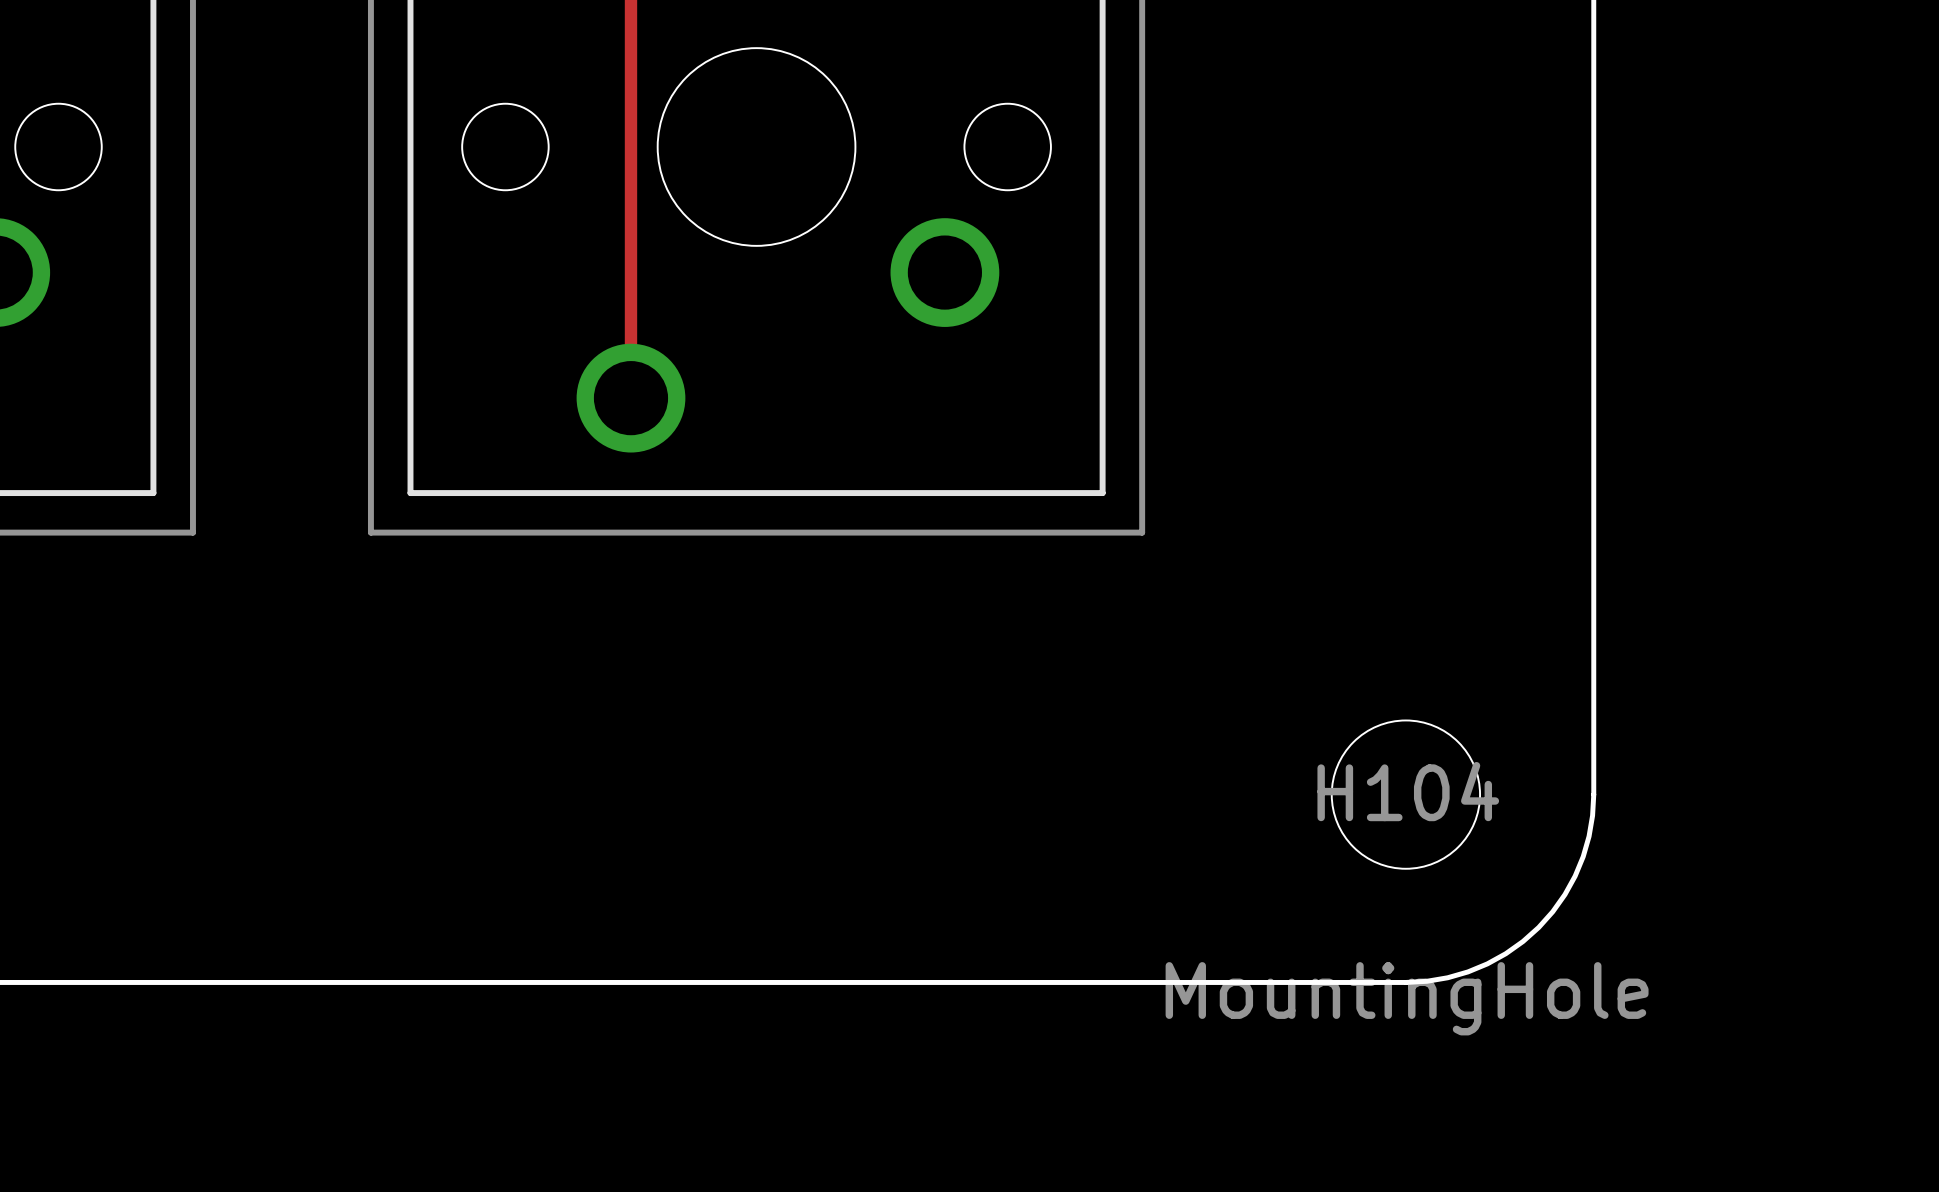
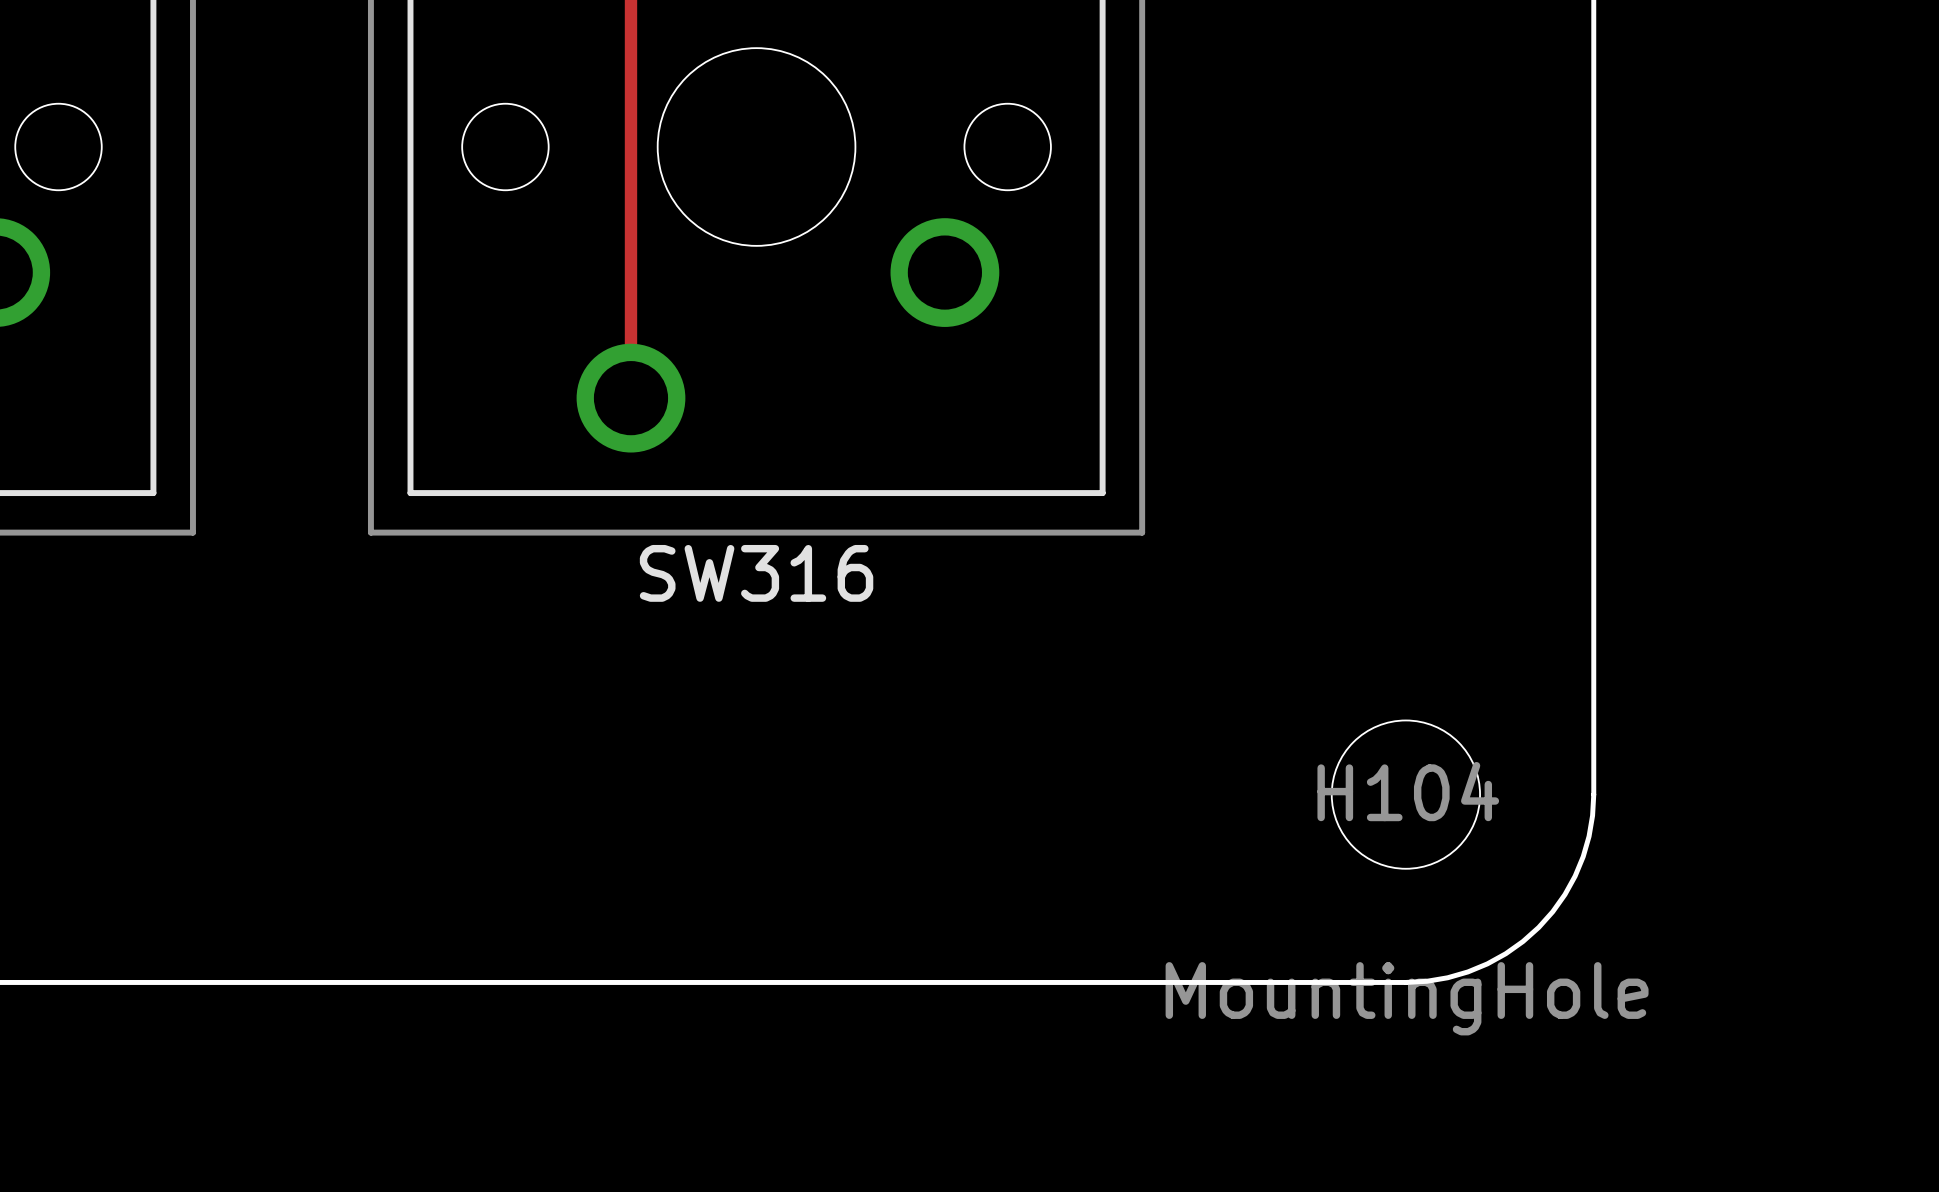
SW316 name: none -> SW316 (756, 573)

